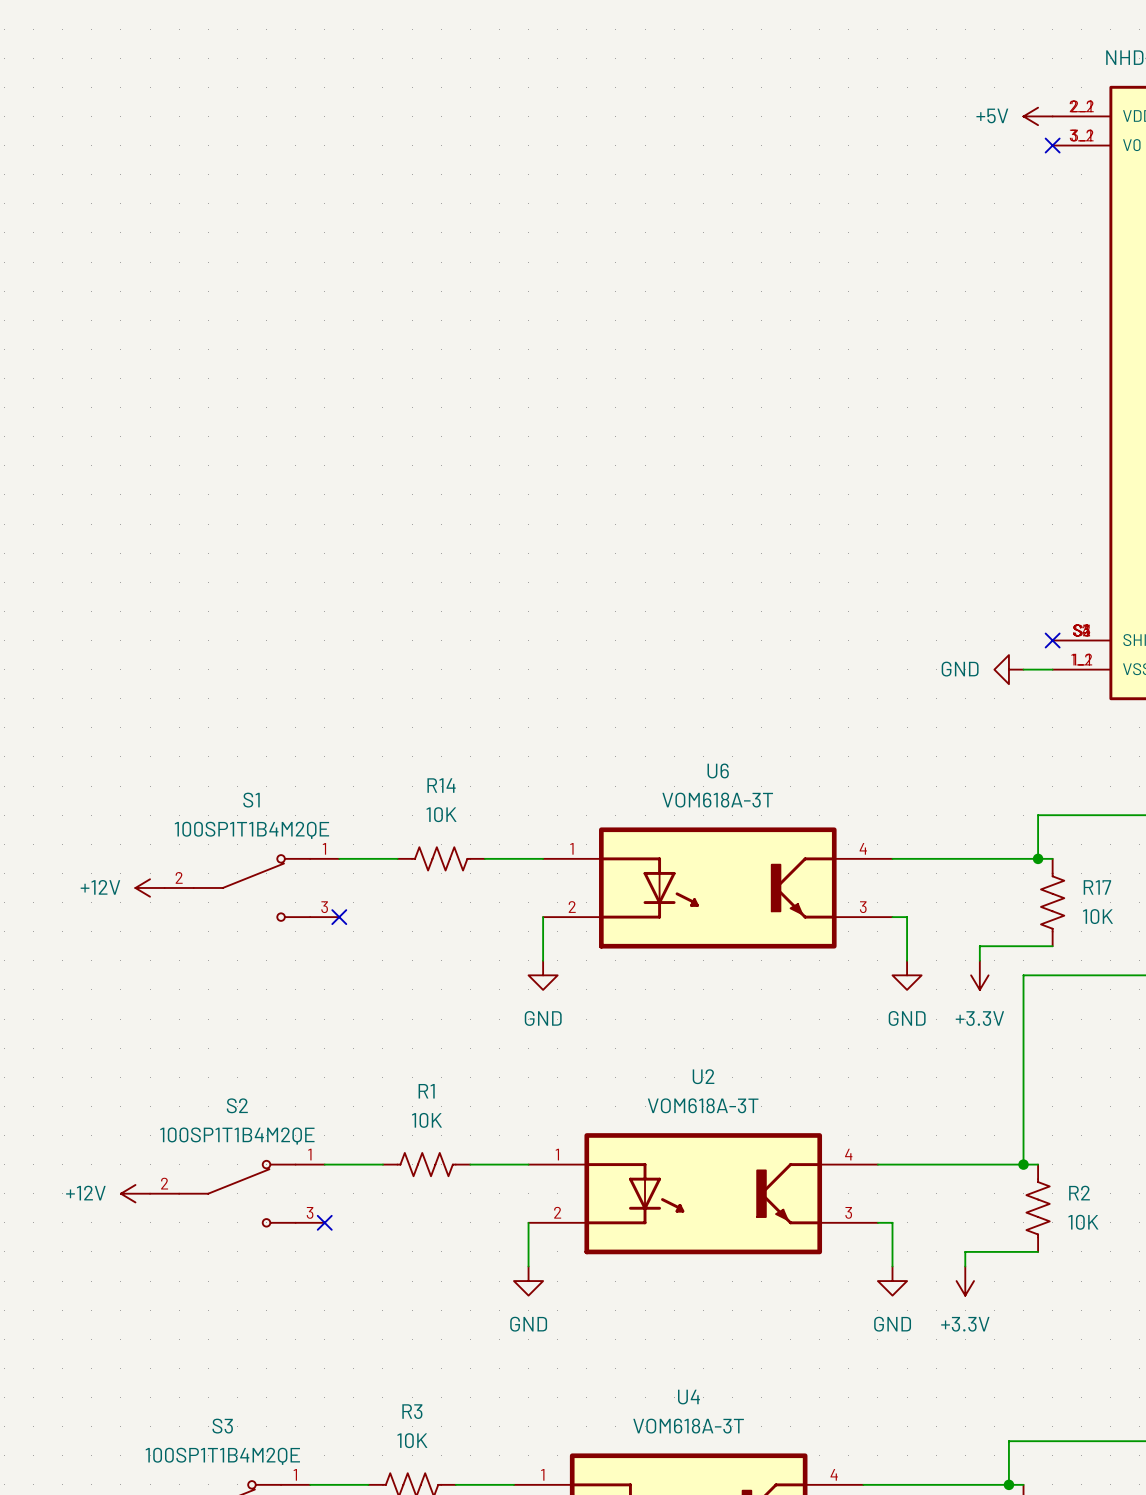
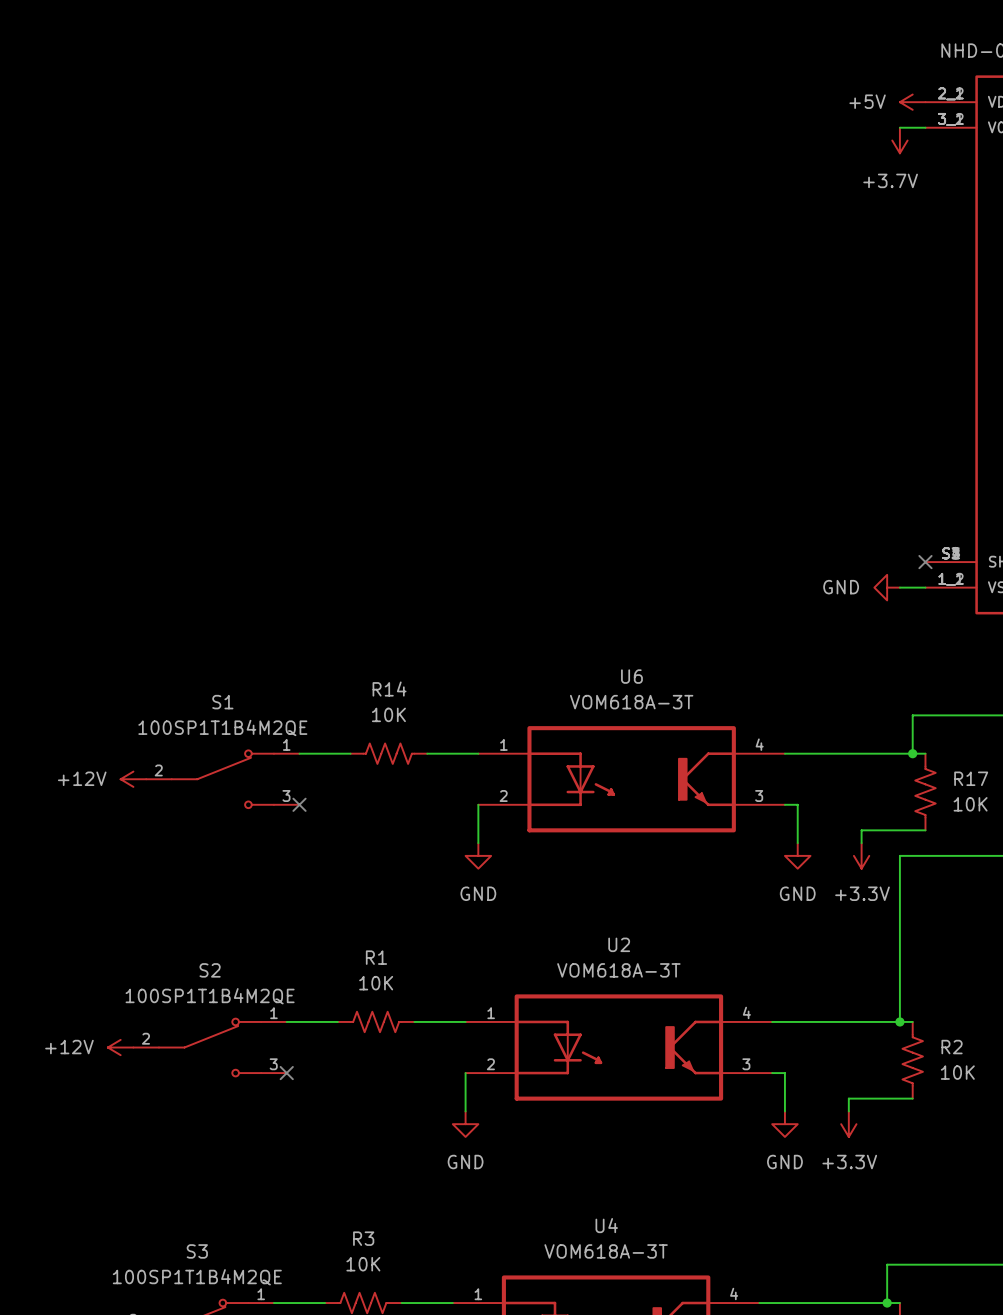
wire: none -> (899, 127) (925, 127)
no-connect mark: (1052, 145) -> none
power symbol: none -> +3.7V (899, 140)

